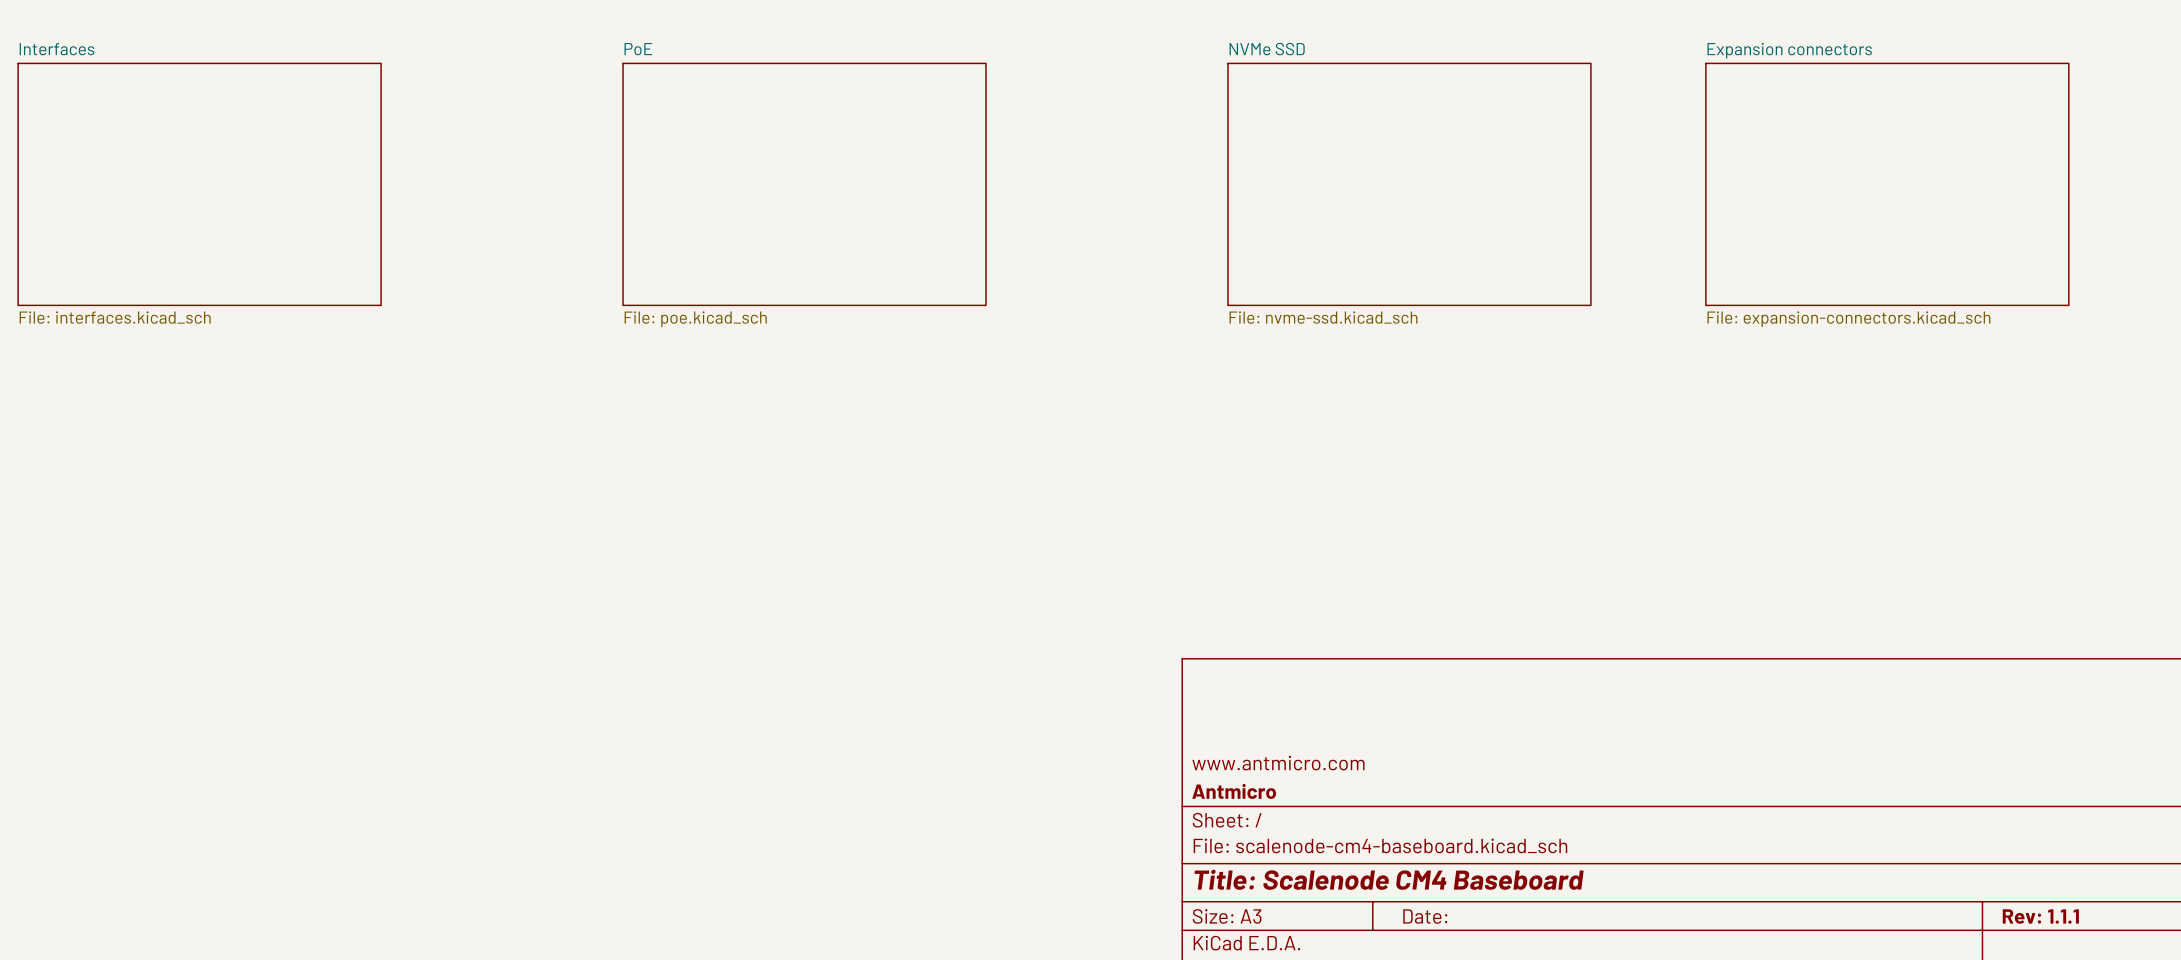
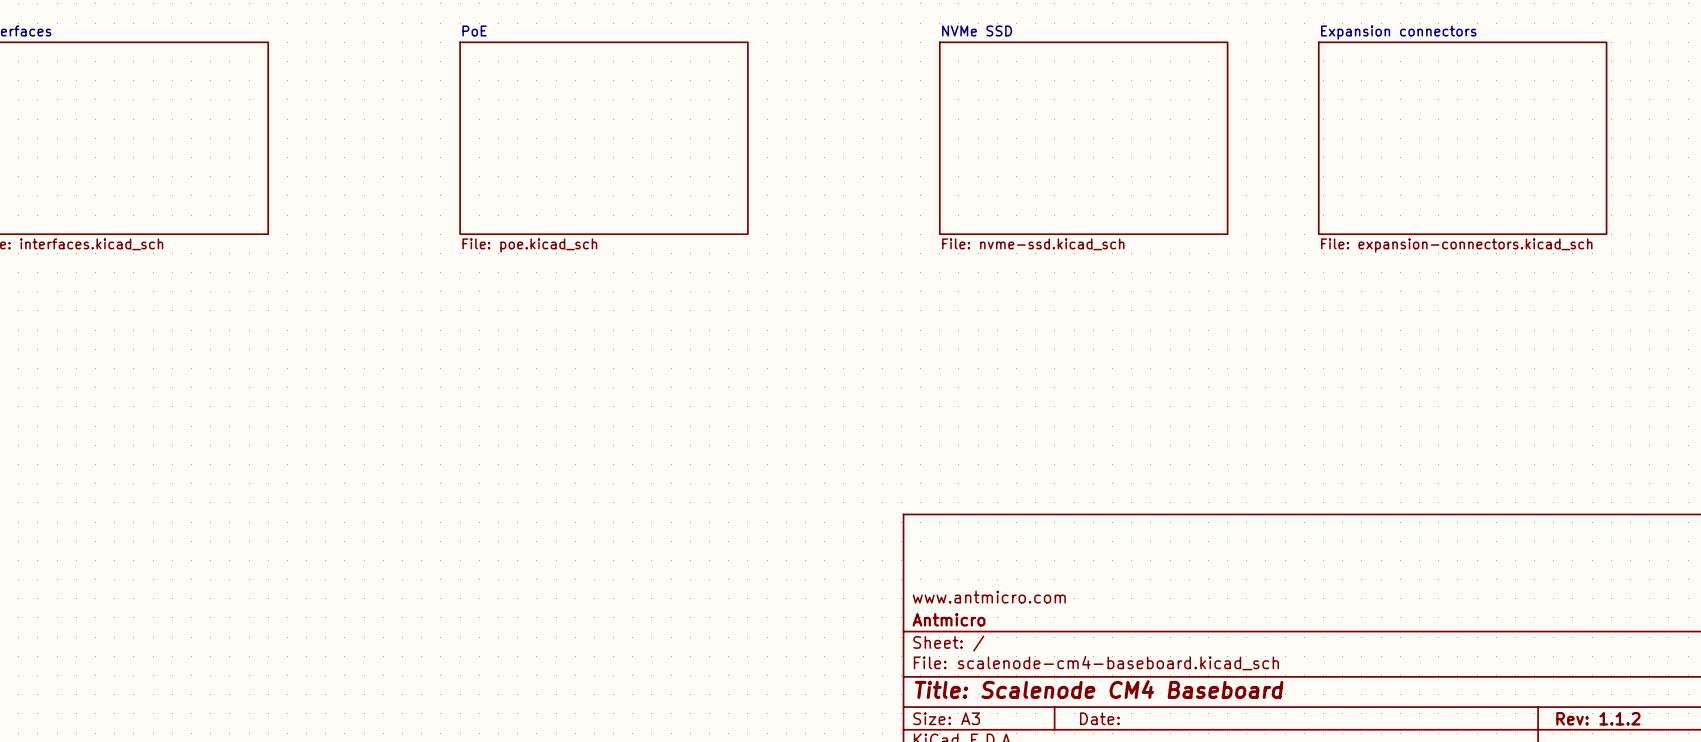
title block: Rev: 1.1.1 (2040, 916) -> Rev: 1.1.2 (1598, 718)

